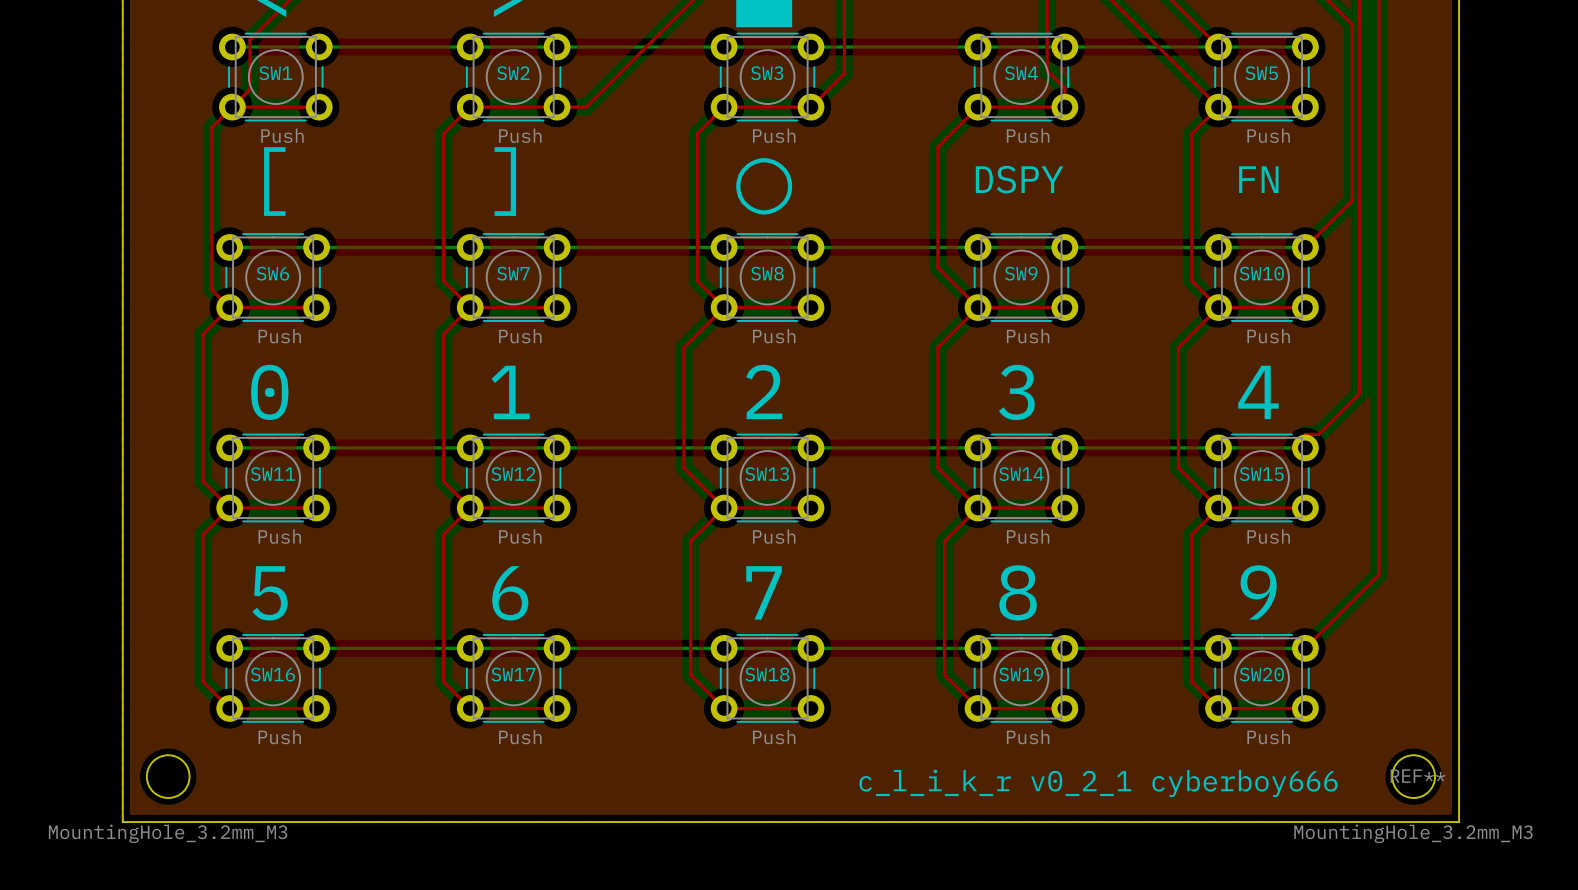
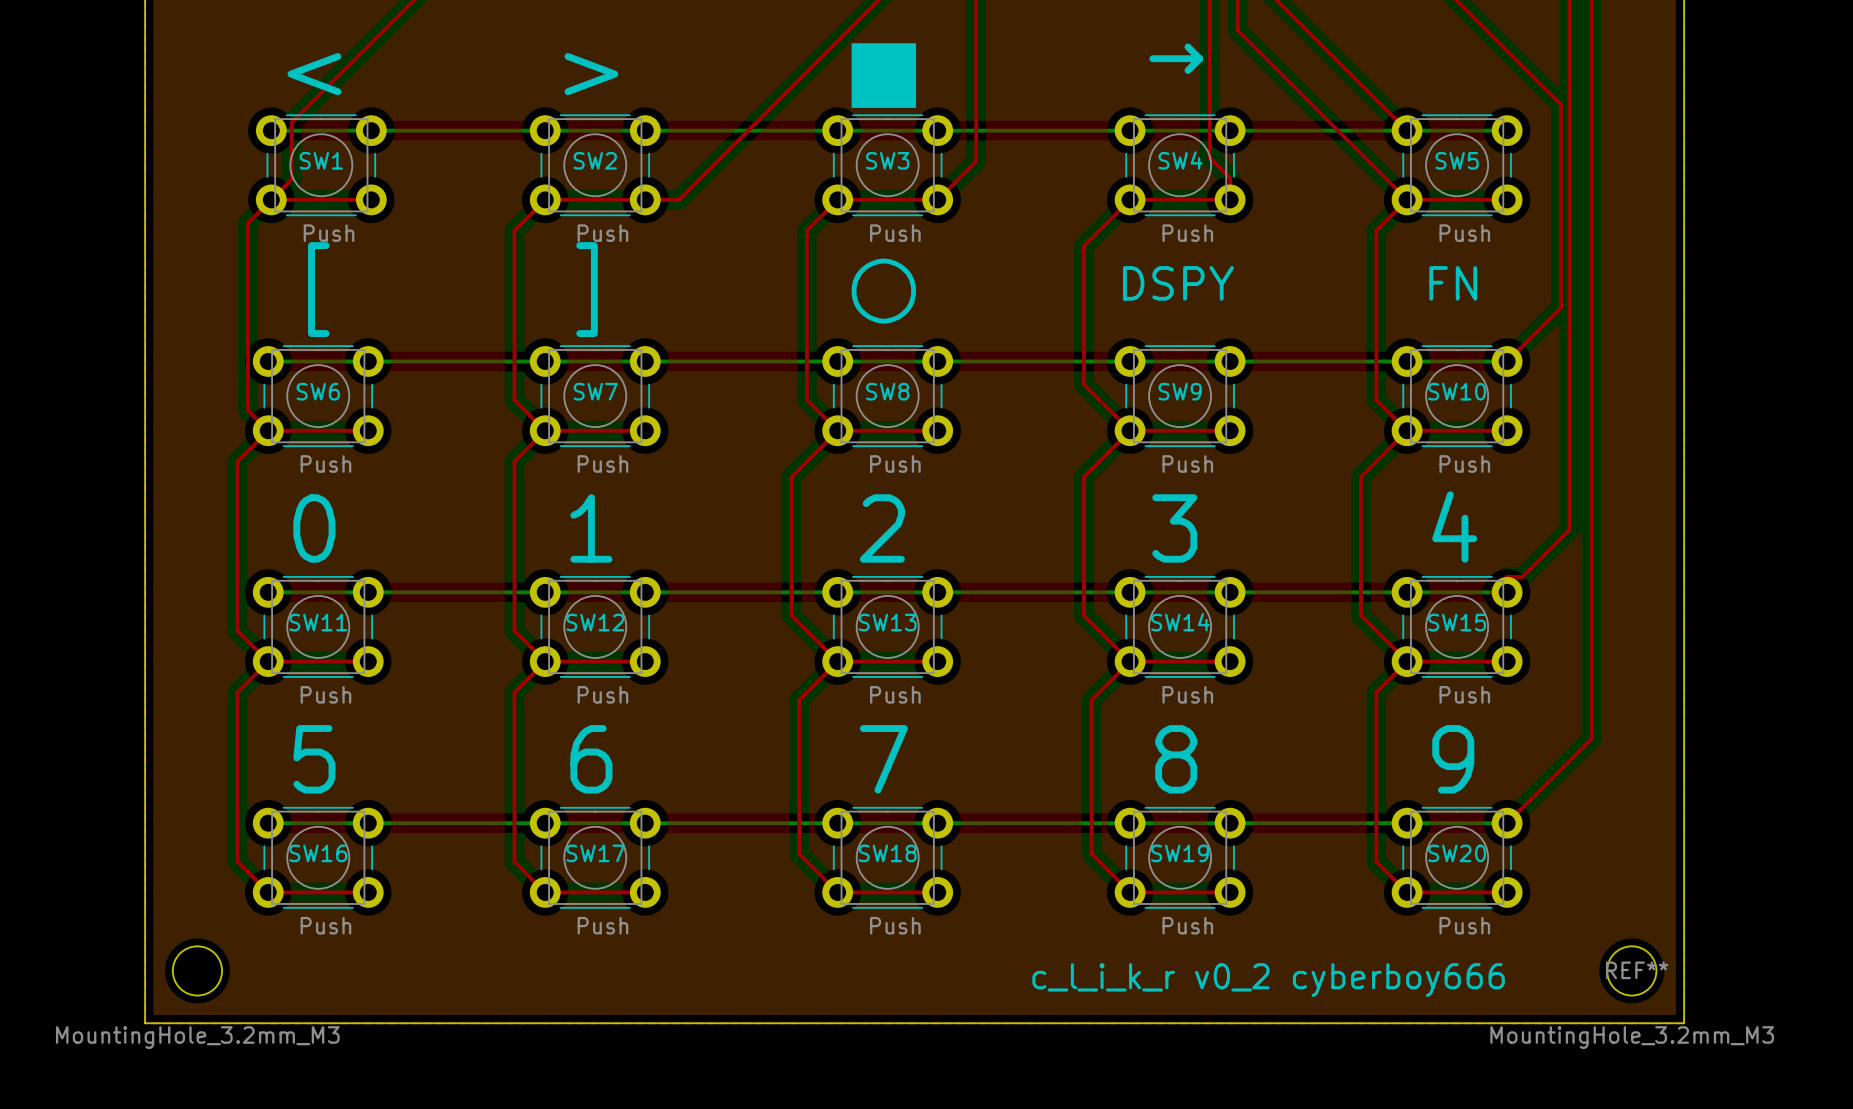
text: c_l_i_k_r v0_2_1 cyberboy666 (1098, 783) -> c_l_i_k_r v0_2 cyberboy666 (1268, 980)

